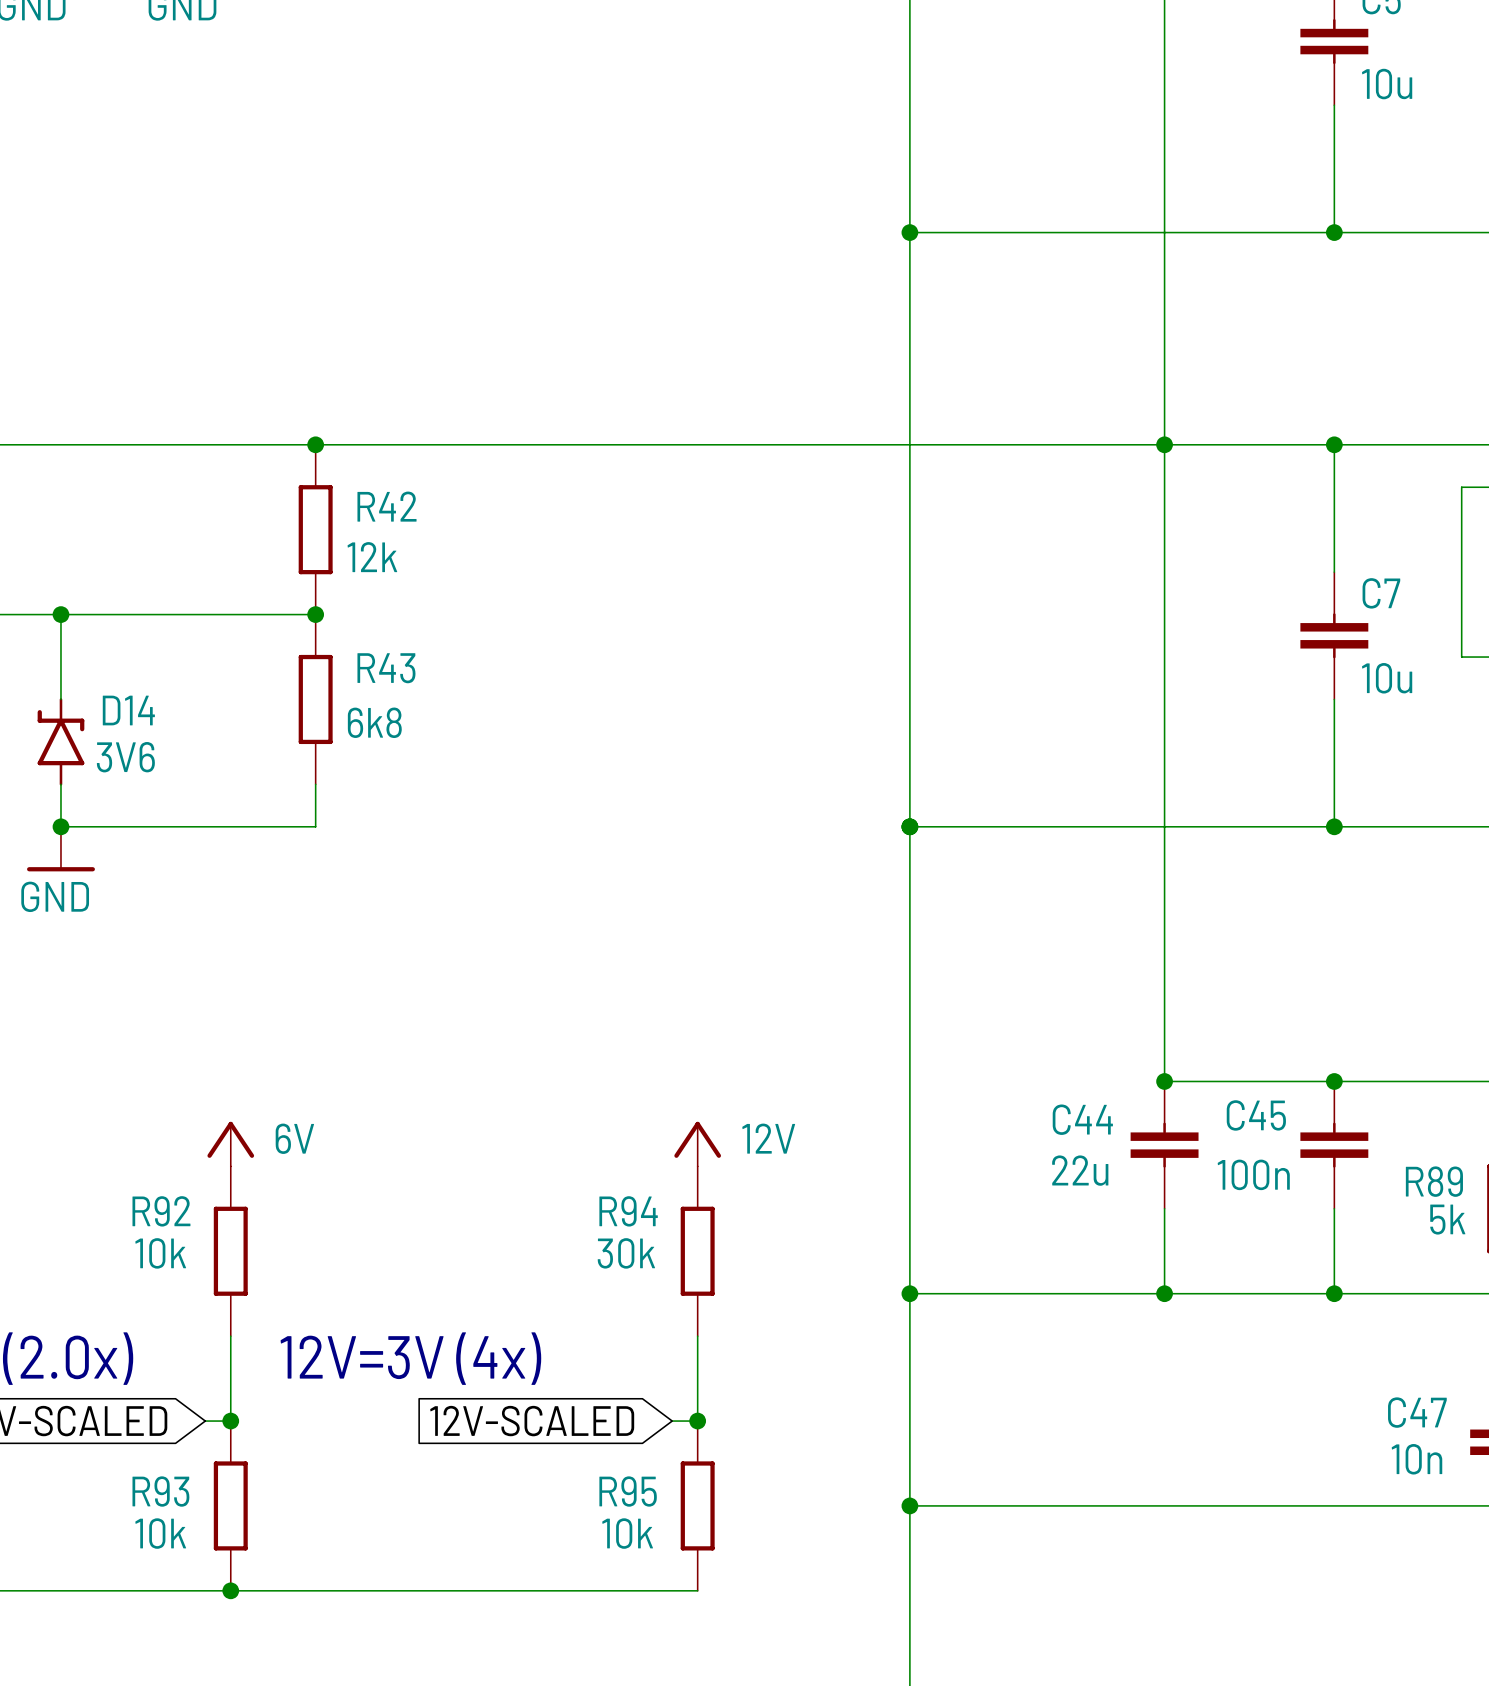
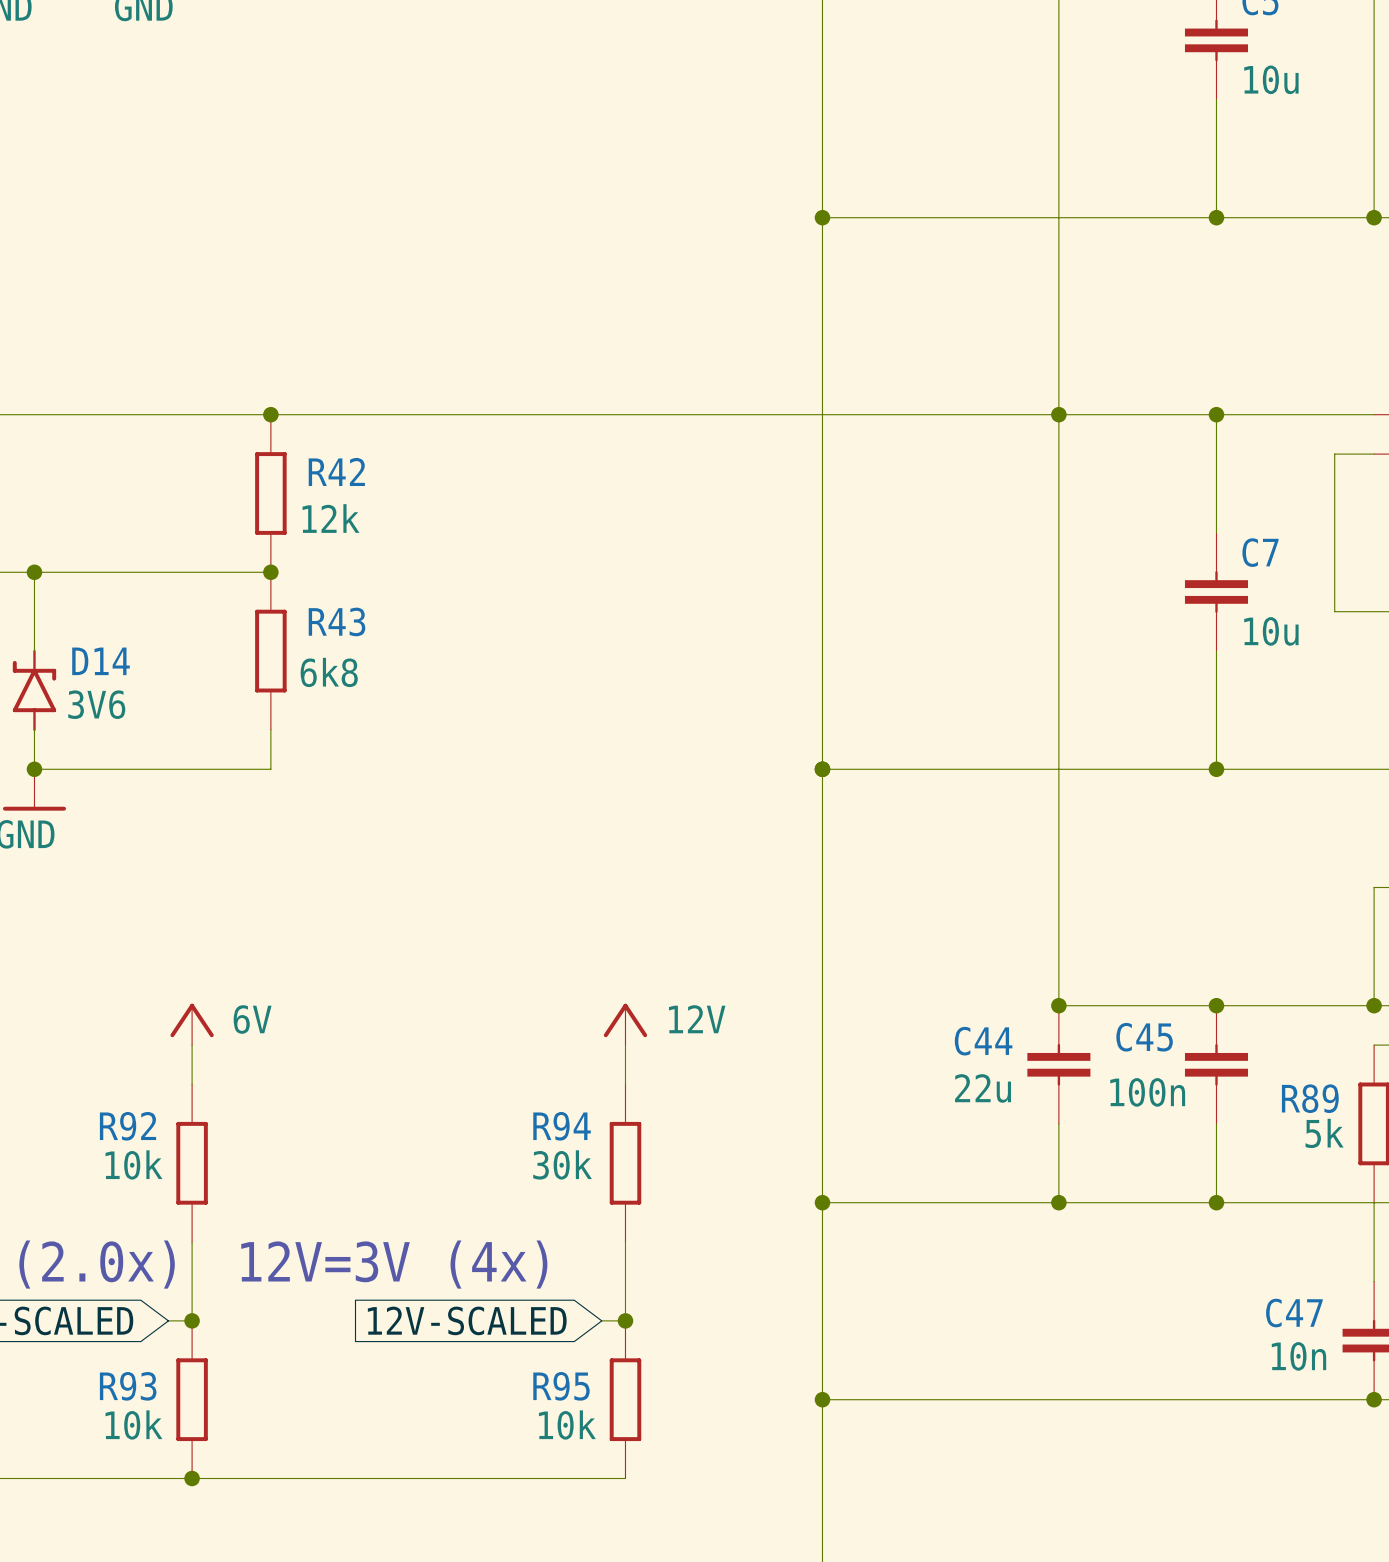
power symbol position: 6V (230, 1144) -> 6V (192, 1024)
power symbol position: 12V (697, 1144) -> 12V (625, 1024)

